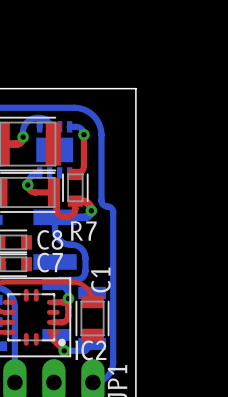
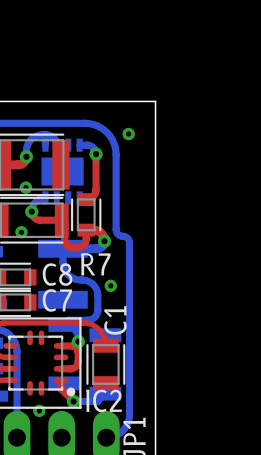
via: none -> (128, 134)
via: none -> (25, 187)
via: none -> (21, 232)
via: none -> (110, 285)
via: none -> (39, 410)

